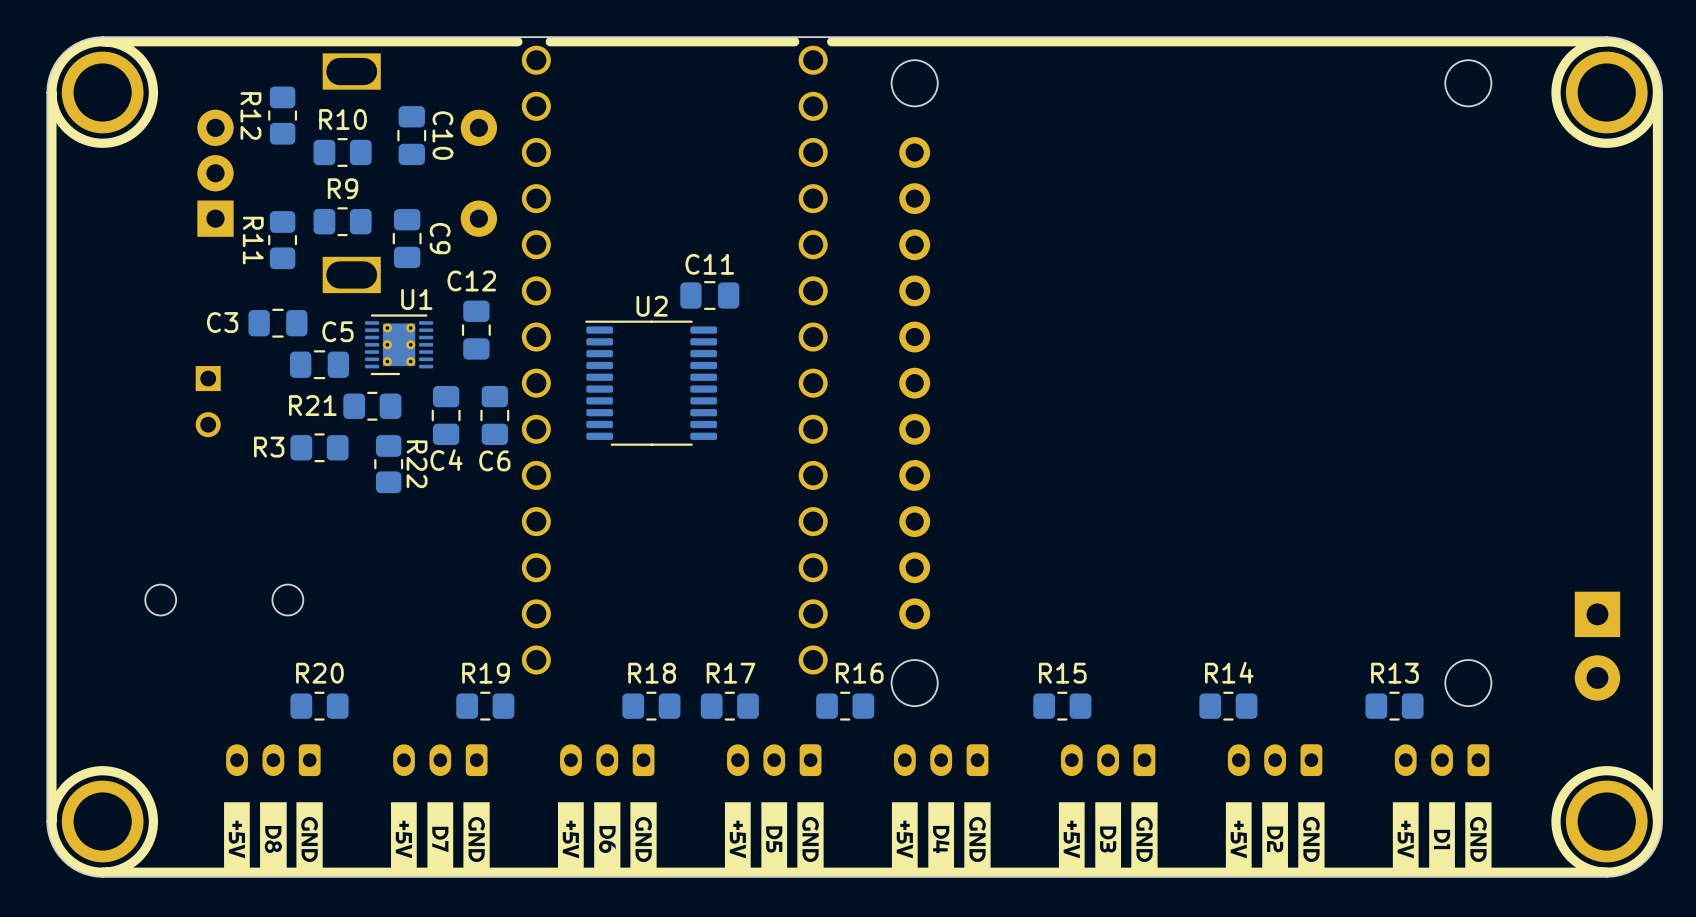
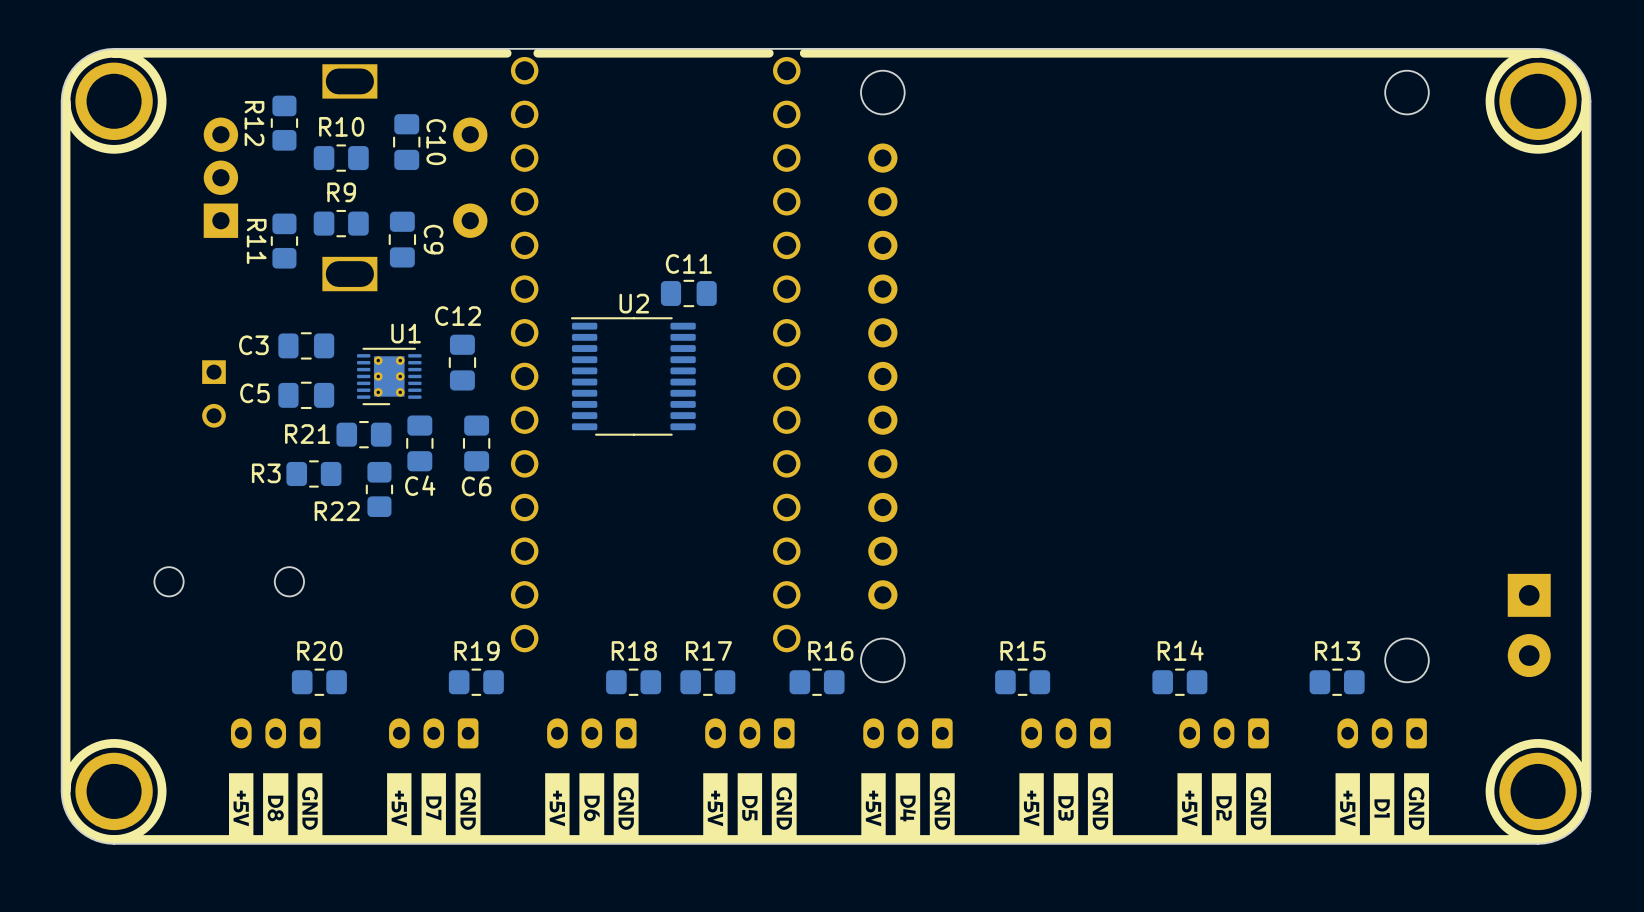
C3 position: (277, 323) -> (306, 345)
C12 position: (476, 330) -> (462, 362)
C5 name position: C5 (337, 331) -> C5 (254, 393)
U1 position: (399, 344) -> (389, 376)
C5 position: (319, 364) -> (306, 395)
R21 position: (372, 406) -> (363, 434)
C4 position: (446, 415) -> (419, 443)
C6 position: (494, 415) -> (476, 443)
R3 position: (319, 447) -> (313, 473)
R22 position: (388, 464) -> (379, 489)
R22 name rotation: 0° (417, 464) -> 90° counterclockwise (337, 511)
R22 name position: R22 (417, 464) -> R22 (337, 511)

